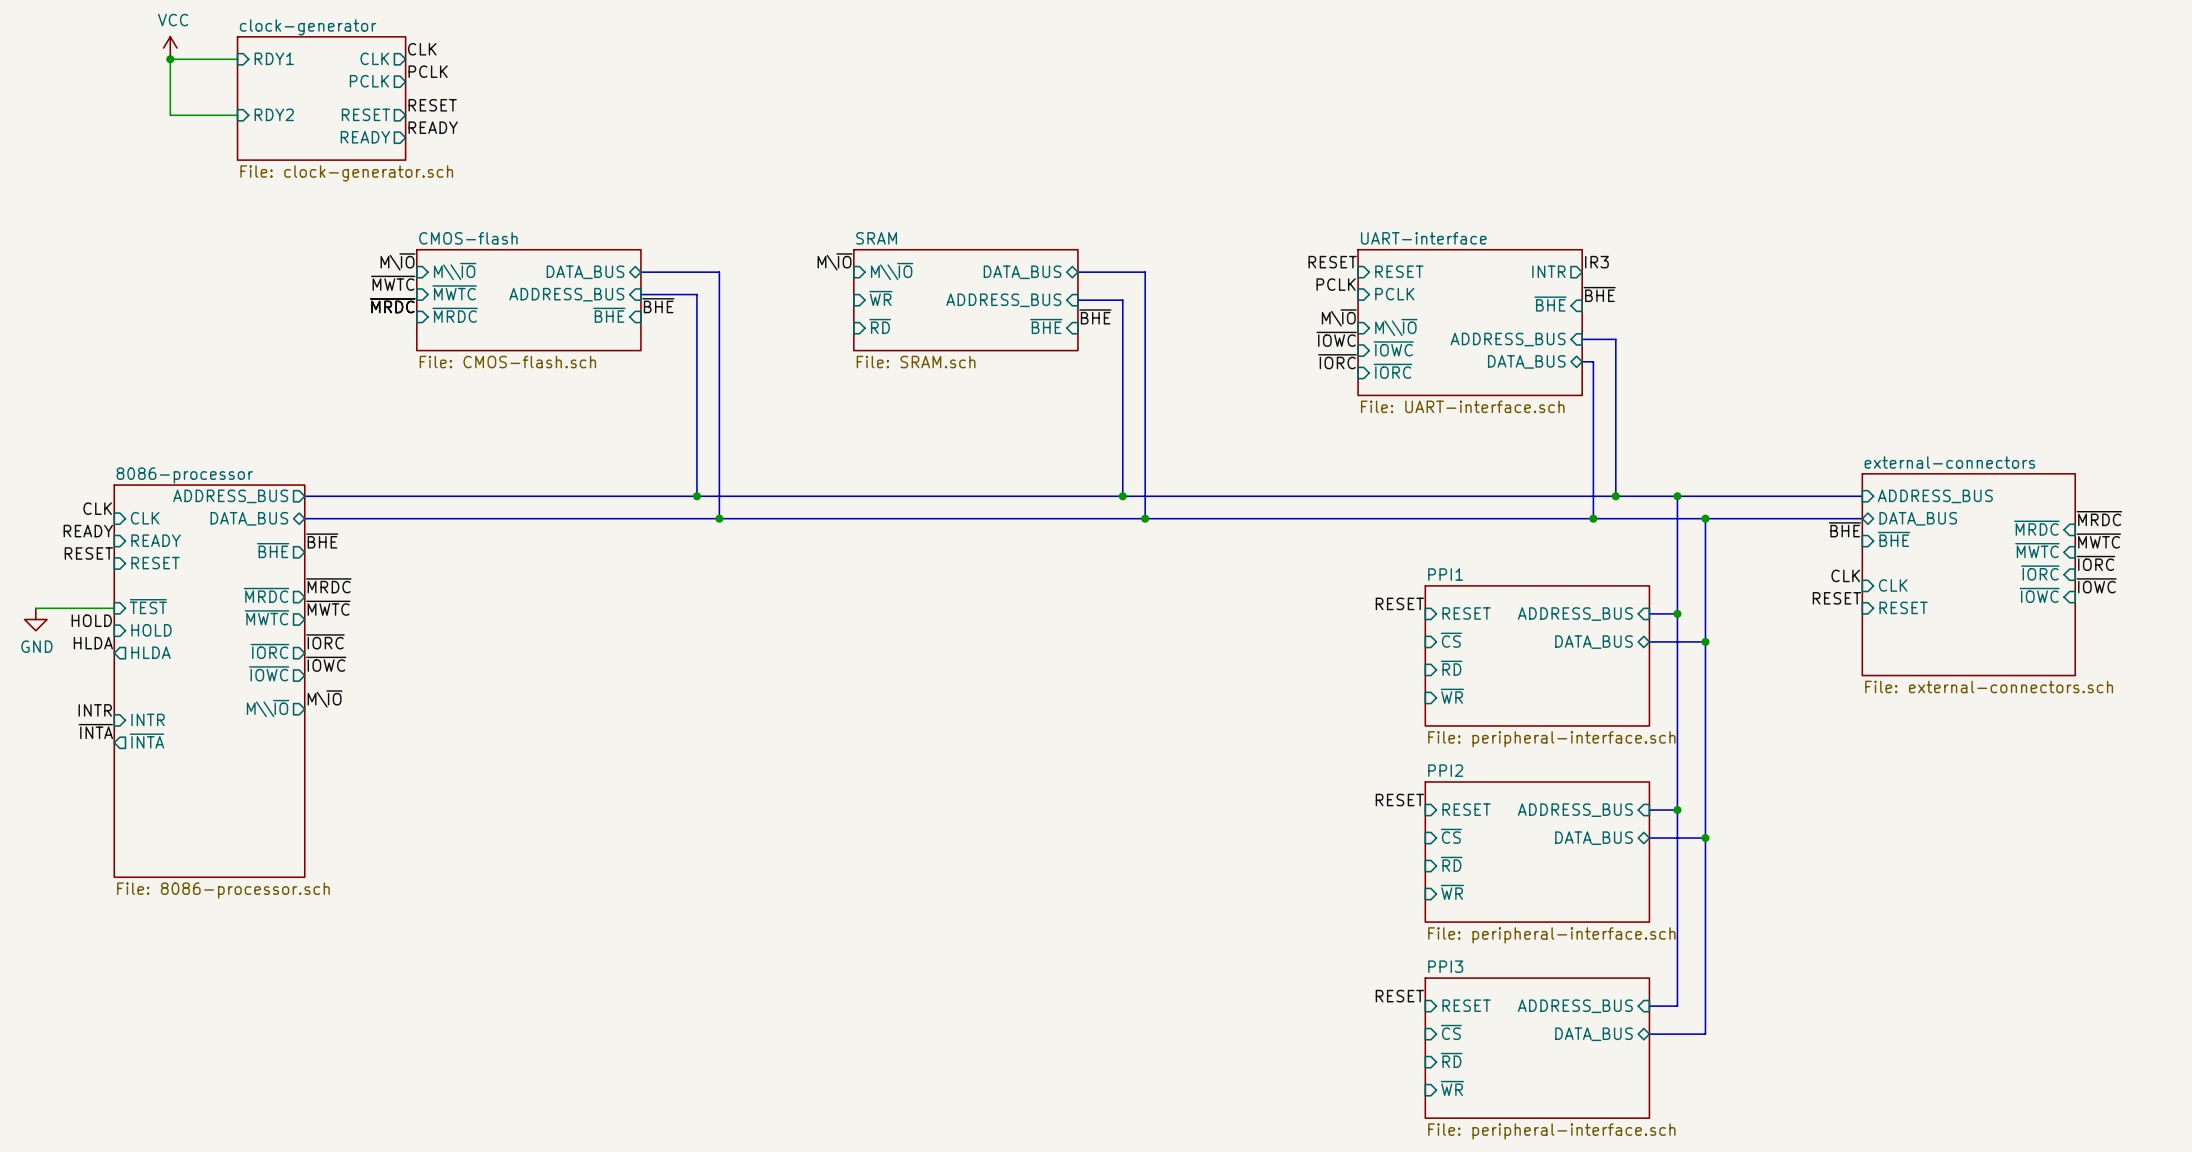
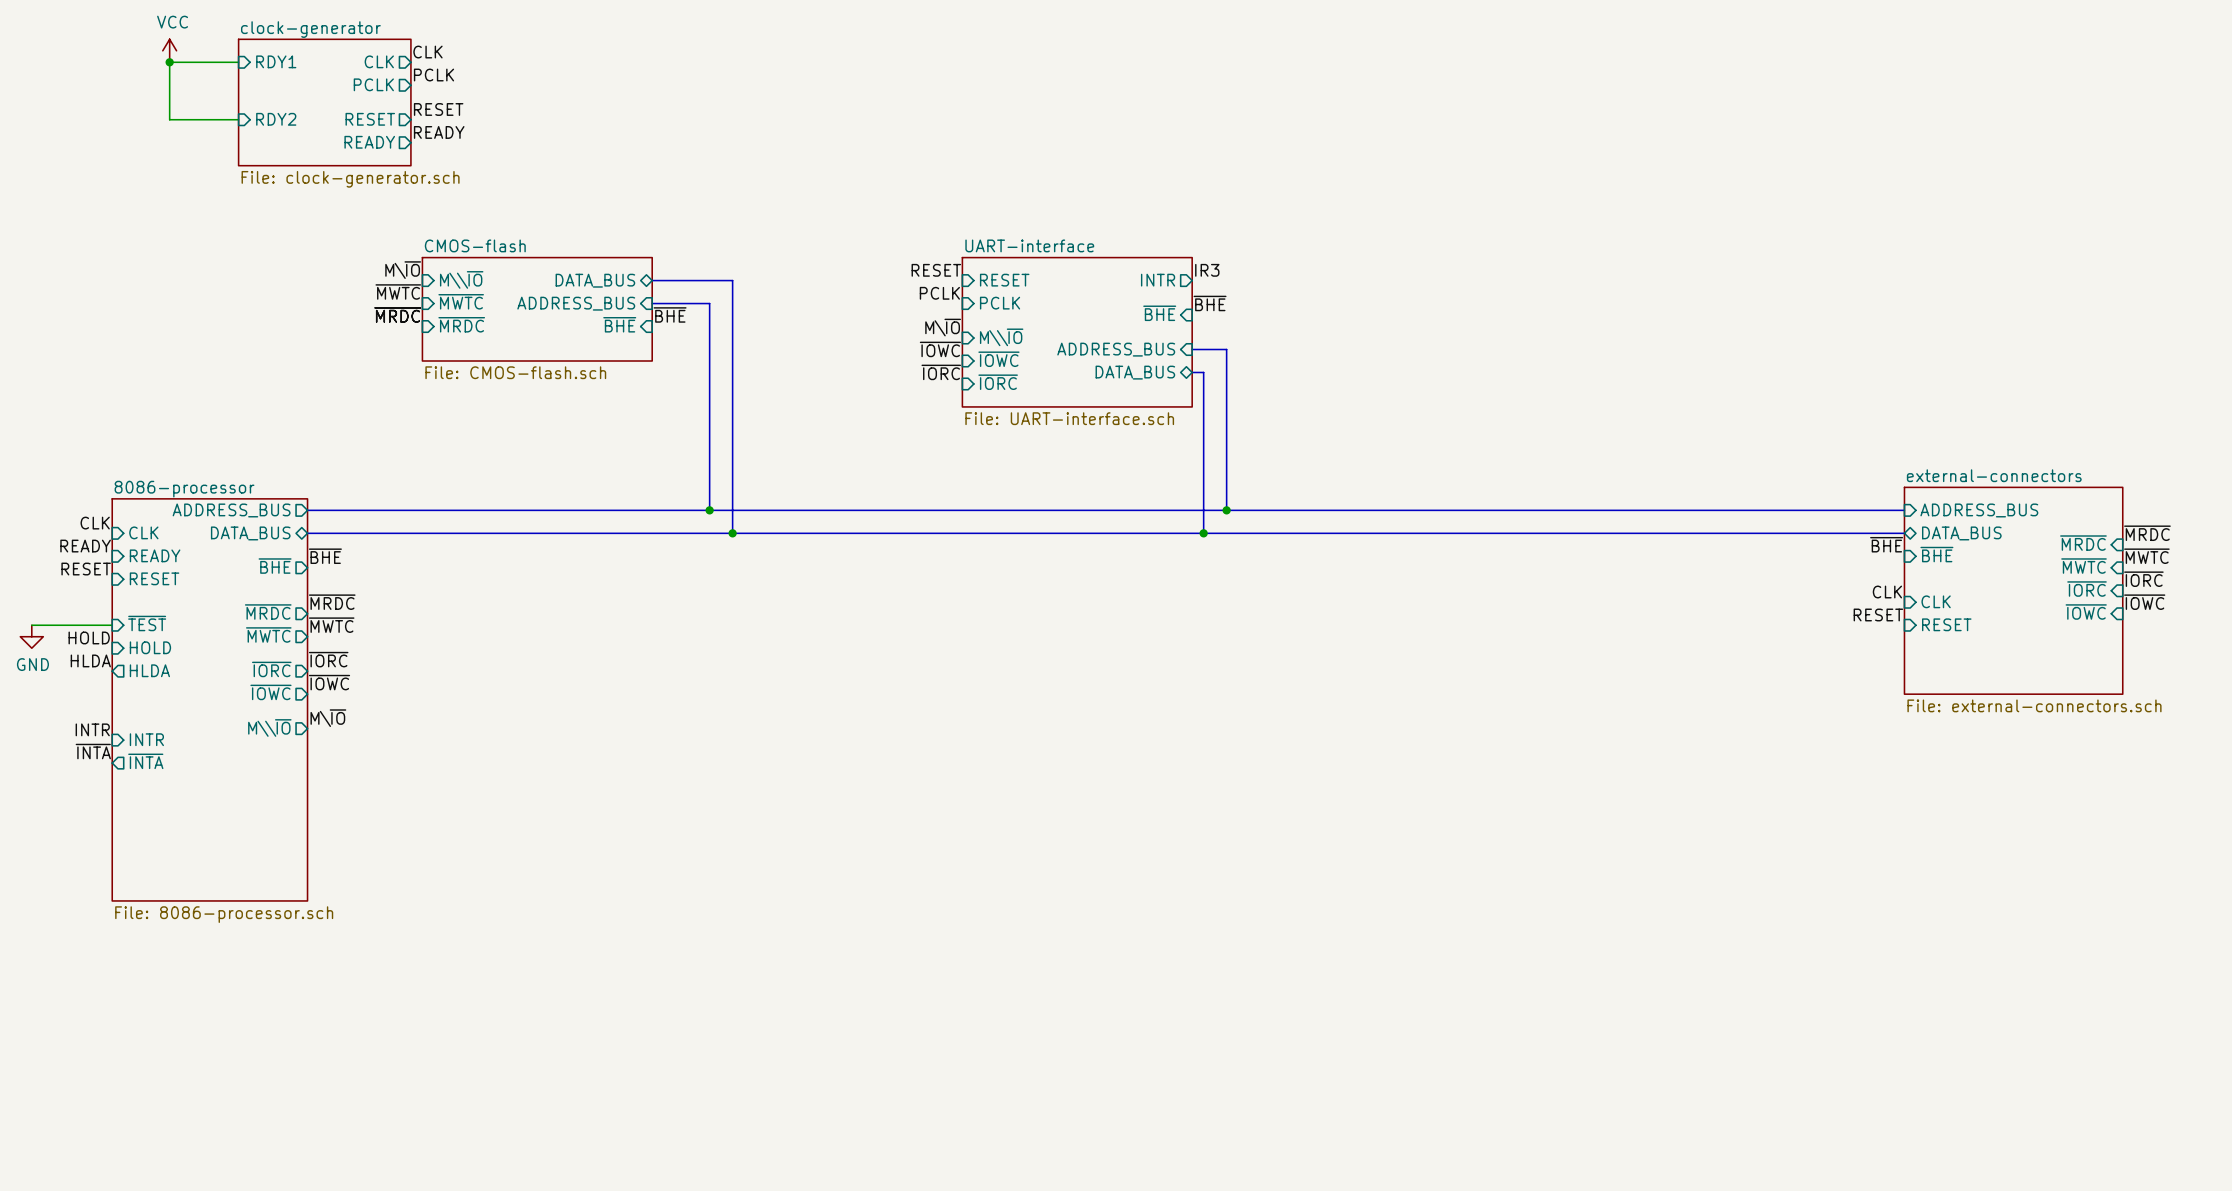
label position: M\~{IO} (835, 261) -> M\~{IO} (943, 327)
label: none -> RESET (936, 270)
label: none -> IR3 (1207, 270)
label: RESET (1332, 262) -> none
label: IR3 (1596, 262) -> none
sheet pin position: M\\~{IO} (892, 271) -> M\\~{IO} (1001, 337)
sheet pin: none -> RESET (1004, 280)
sheet pin: none -> INTR (1158, 280)
sheet pin: RESET (1399, 271) -> none
sheet pin: INTR (1548, 271) -> none
sheet pin position: DATA_BUS (1022, 272) -> DATA_BUS (1135, 372)
bus: (1077, 272) (1145, 272) (1145, 518) -> none
label: none -> PCLK (939, 293)
label: PCLK (1336, 284) -> none
sheet pin: none -> PCLK (1000, 303)
sheet pin: PCLK (1394, 294) -> none
label: ~{BHE} (1599, 294) -> none
sheet pin: ~{WR} (880, 298) -> none
sheet SRAM: File: SRAM.sch (965, 300) -> none
sheet pin position: ADDRESS_BUS (1003, 300) -> ADDRESS_BUS (1116, 349)
bus: (1077, 300) (1122, 300) (1122, 496) -> none
sheet pin: ~{BHE} (1550, 304) -> none
label position: ~{BHE} (1095, 316) -> ~{BHE} (1210, 303)
label: M\~{IO} (1339, 317) -> none
sheet UART-interface: none -> File: UART-interface.sch (1077, 332)
sheet UART-interface: File: UART-interface.sch (1470, 322) -> none
sheet pin: ~{RD} (880, 326) -> none
sheet pin position: ~{BHE} (1046, 326) -> ~{BHE} (1159, 313)
sheet pin: M\\~{IO} (1396, 327) -> none
label: none -> ~{IOWC} (940, 349)
bus: none -> (1192, 349) (1226, 349) (1226, 510)
label: ~{IOWC} (1336, 339) -> none
sheet pin: ADDRESS_BUS (1508, 339) -> none
bus: (1582, 339) (1615, 339) (1615, 496) -> none
sheet pin: none -> ~{IOWC} (998, 359)
sheet pin: ~{IOWC} (1393, 348) -> none
label: none -> ~{IORC} (941, 372)
bus: none -> (1192, 372) (1203, 372) (1203, 533)
label: ~{IORC} (1337, 361) -> none
sheet pin: DATA_BUS (1526, 361) -> none
bus: (1582, 361) (1593, 361) (1593, 518) -> none
sheet pin: none -> ~{IORC} (998, 382)
sheet pin: ~{IORC} (1392, 371) -> none
junction: (1122, 496) -> none
junction: none -> (1226, 510)
junction: (1615, 496) -> none
bus: (1677, 496) (1677, 1006) (1649, 1006) -> none
junction: (1677, 496) -> none
junction: (1145, 518) -> none
junction: none -> (1203, 533)
junction: (1593, 518) -> none
bus: (1705, 518) (1705, 1034) (1649, 1034) -> none
junction: (1705, 518) -> none
label: RESET (1399, 603) -> none
sheet pin: RESET (1466, 613) -> none
bus: (1649, 613) (1677, 613) -> none
junction: (1677, 613) -> none
sheet pin: ADDRESS_BUS (1575, 614) -> none
sheet pin: ~{CS} (1451, 640) -> none
bus: (1649, 641) (1705, 641) -> none
junction: (1705, 641) -> none
sheet pin: DATA_BUS (1594, 642) -> none
sheet PPI1: File: peripheral-interface.sch (1537, 655) -> none
sheet pin: ~{RD} (1451, 668) -> none
sheet pin: ~{WR} (1452, 696) -> none
label: RESET (1399, 800) -> none
sheet pin: RESET (1466, 809) -> none
sheet pin: ADDRESS_BUS (1575, 810) -> none
bus: (1649, 810) (1677, 810) -> none
junction: (1677, 810) -> none
sheet pin: ~{CS} (1451, 836) -> none
sheet pin: DATA_BUS (1594, 838) -> none
bus: (1649, 838) (1705, 838) -> none
junction: (1705, 838) -> none
sheet PPI2: File: peripheral-interface.sch (1537, 852) -> none
sheet pin: ~{RD} (1451, 864) -> none
sheet pin: ~{WR} (1452, 892) -> none
label: RESET (1399, 996) -> none
sheet pin: RESET (1466, 1005) -> none
sheet pin: ADDRESS_BUS (1575, 1006) -> none
sheet pin: ~{CS} (1451, 1032) -> none
sheet pin: DATA_BUS (1594, 1034) -> none
sheet PPI3: File: peripheral-interface.sch (1537, 1048) -> none
sheet pin: ~{RD} (1451, 1060) -> none
sheet pin: ~{WR} (1452, 1088) -> none

